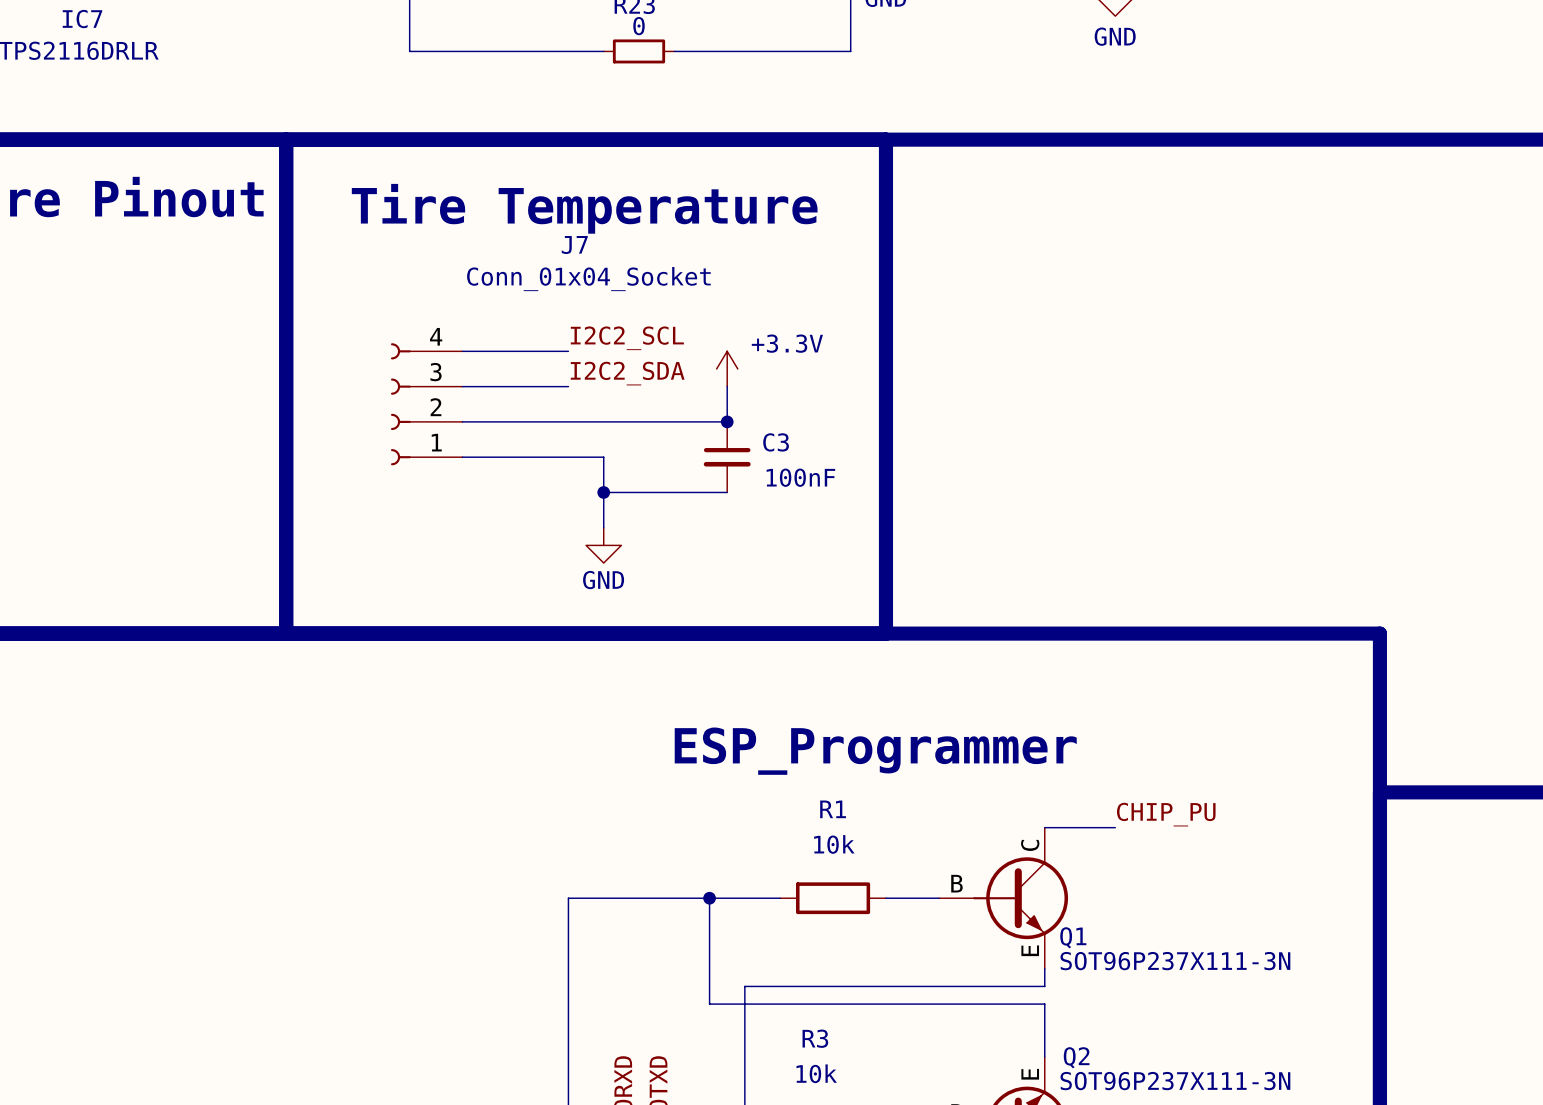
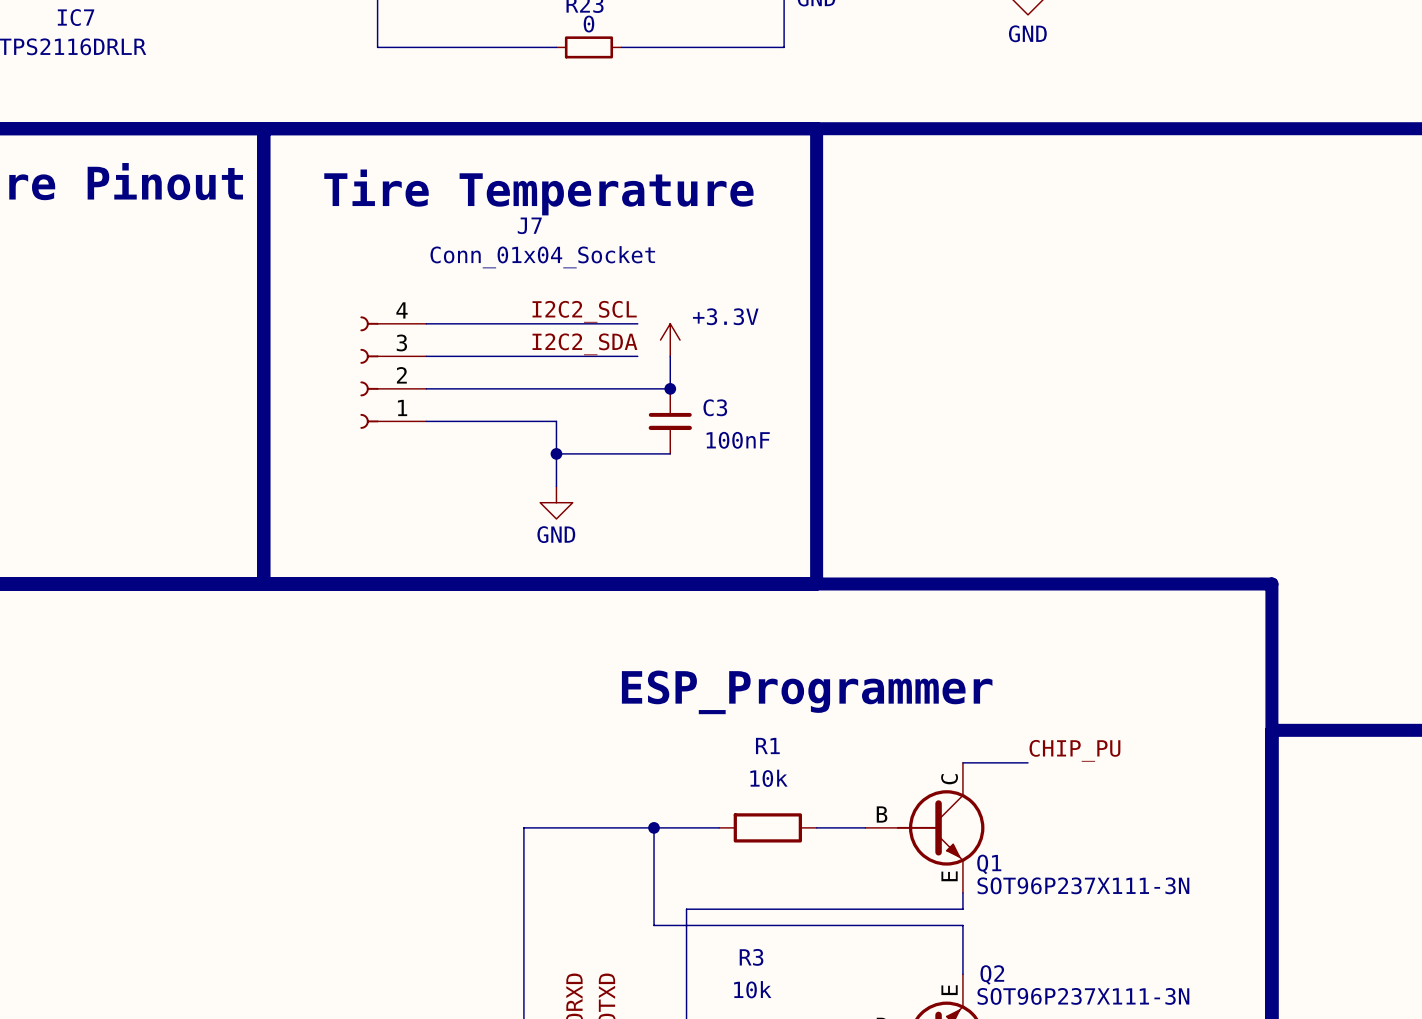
label position: I2C2_SCL (627, 338) -> I2C2_SCL (584, 311)
wire: none -> (523, 323) (637, 323)
label position: I2C2_SDA (627, 373) -> I2C2_SDA (584, 344)
wire: none -> (523, 356) (637, 356)

